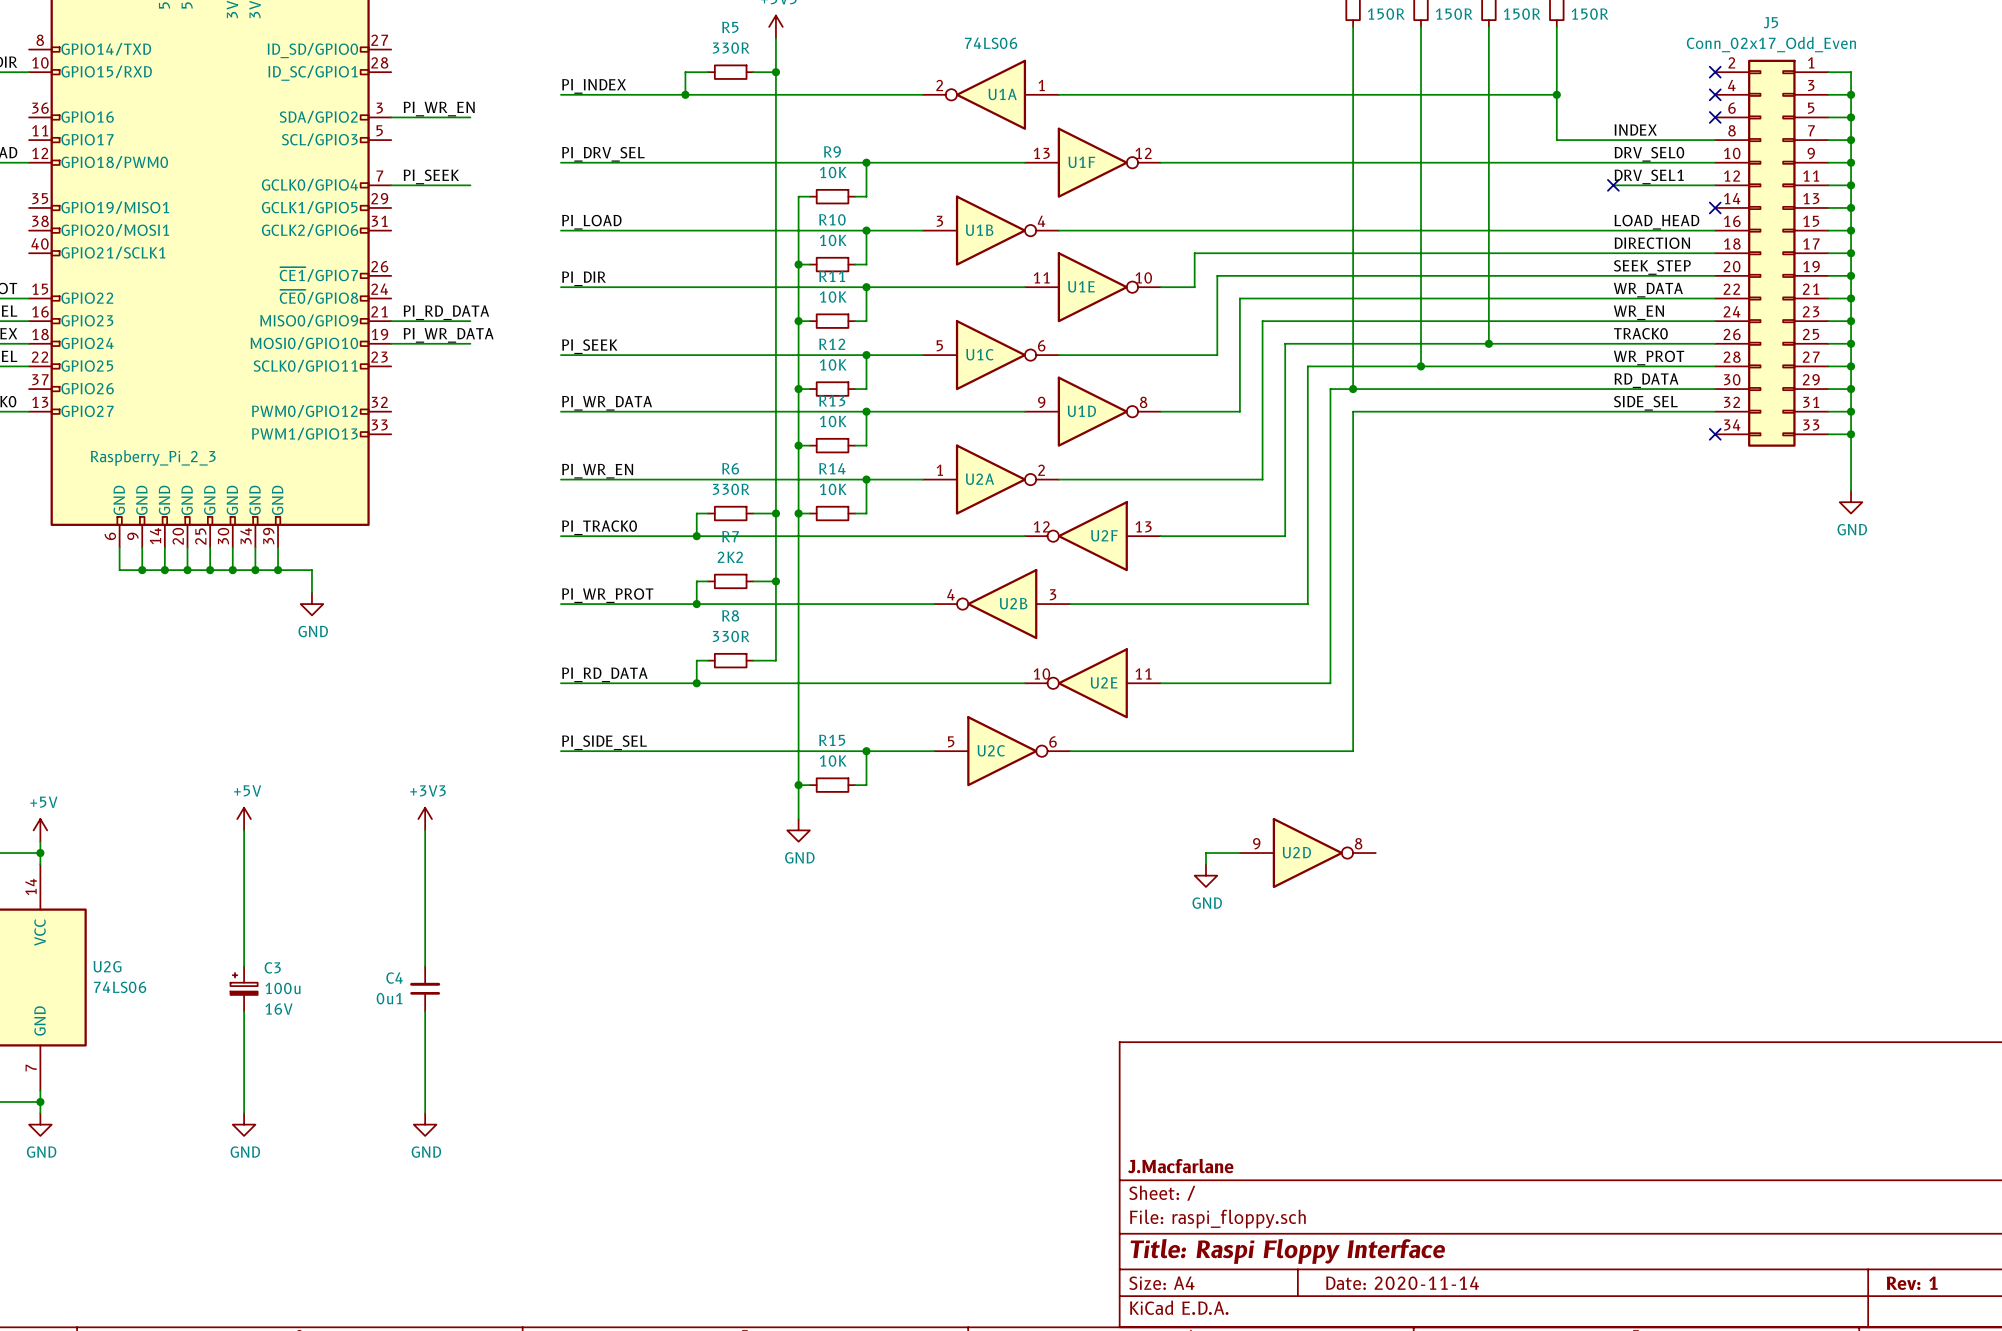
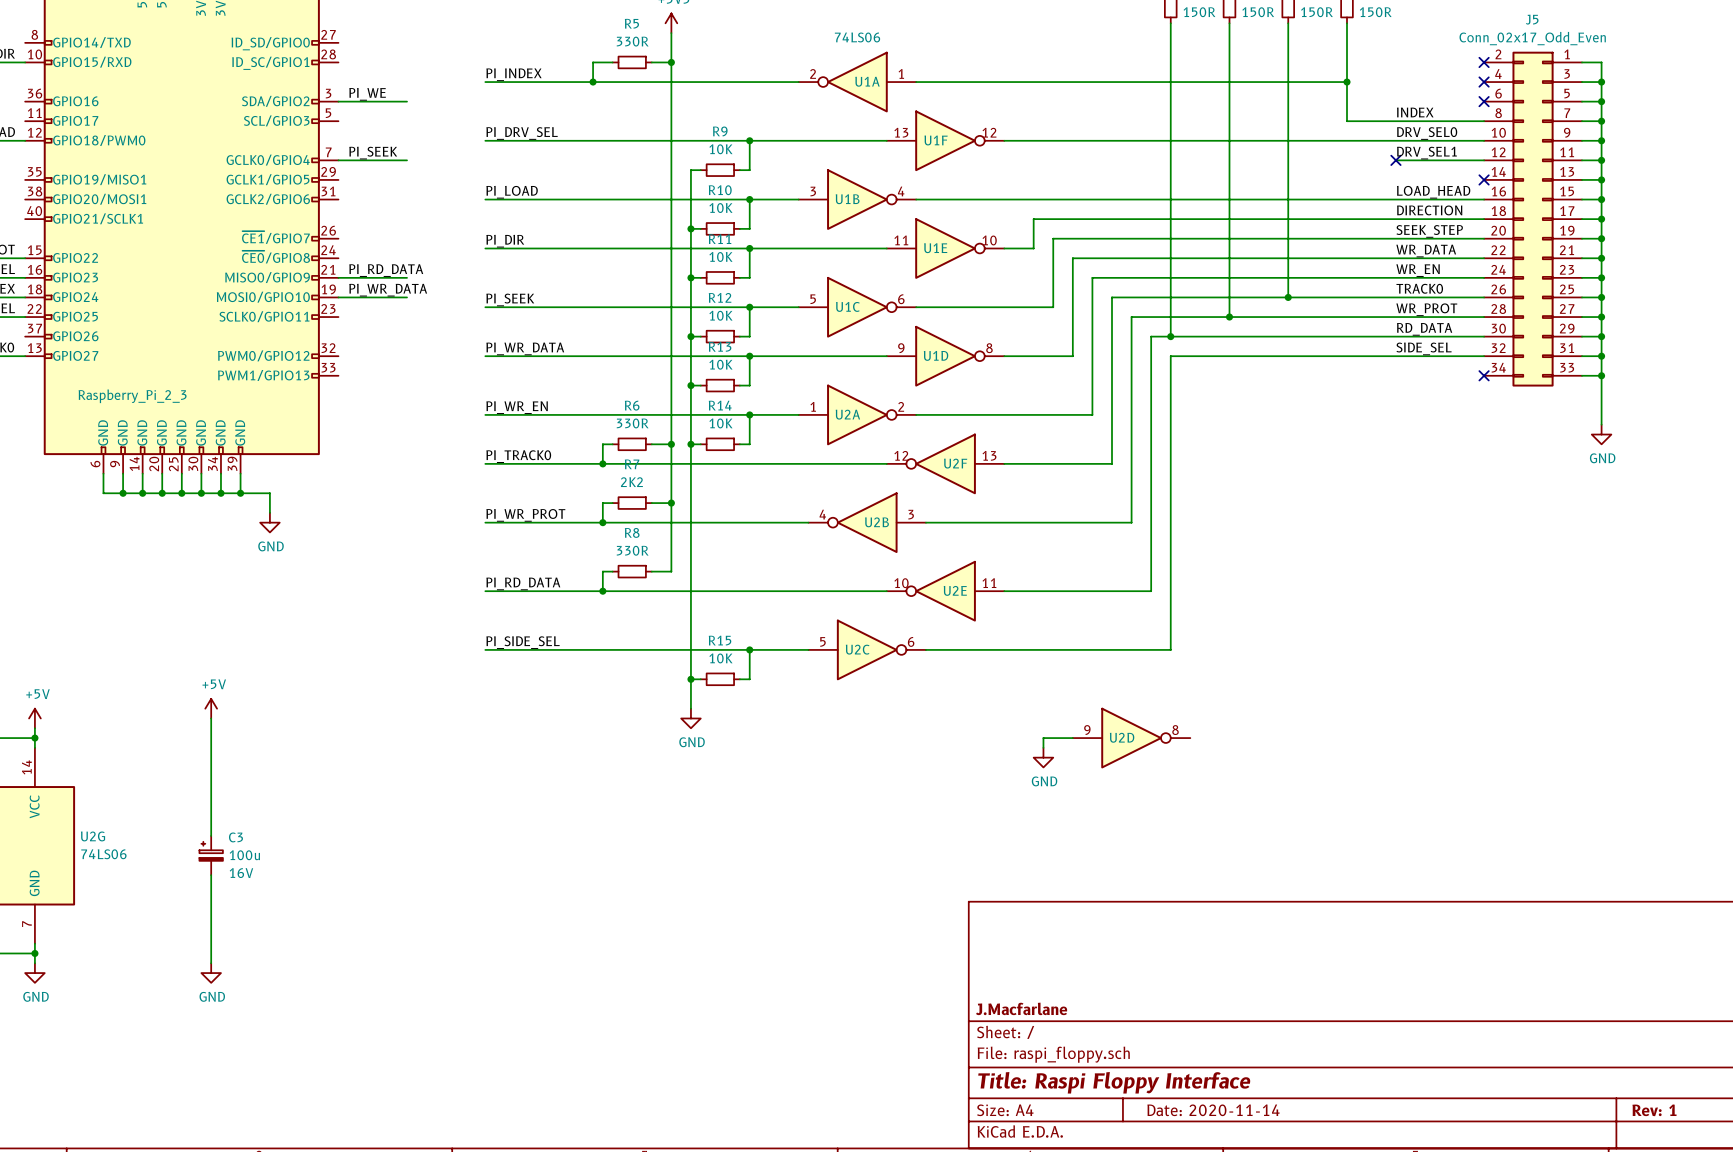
label: PI_WR_EN (439, 109) -> PI_WE (367, 94)
power symbol: +3V3 (425, 819) -> none
wire: (425, 830) (425, 966) -> none
C4: 0u1 (425, 988) -> none
wire: (425, 1011) (425, 1113) -> none
power symbol: GND (425, 1124) -> none

